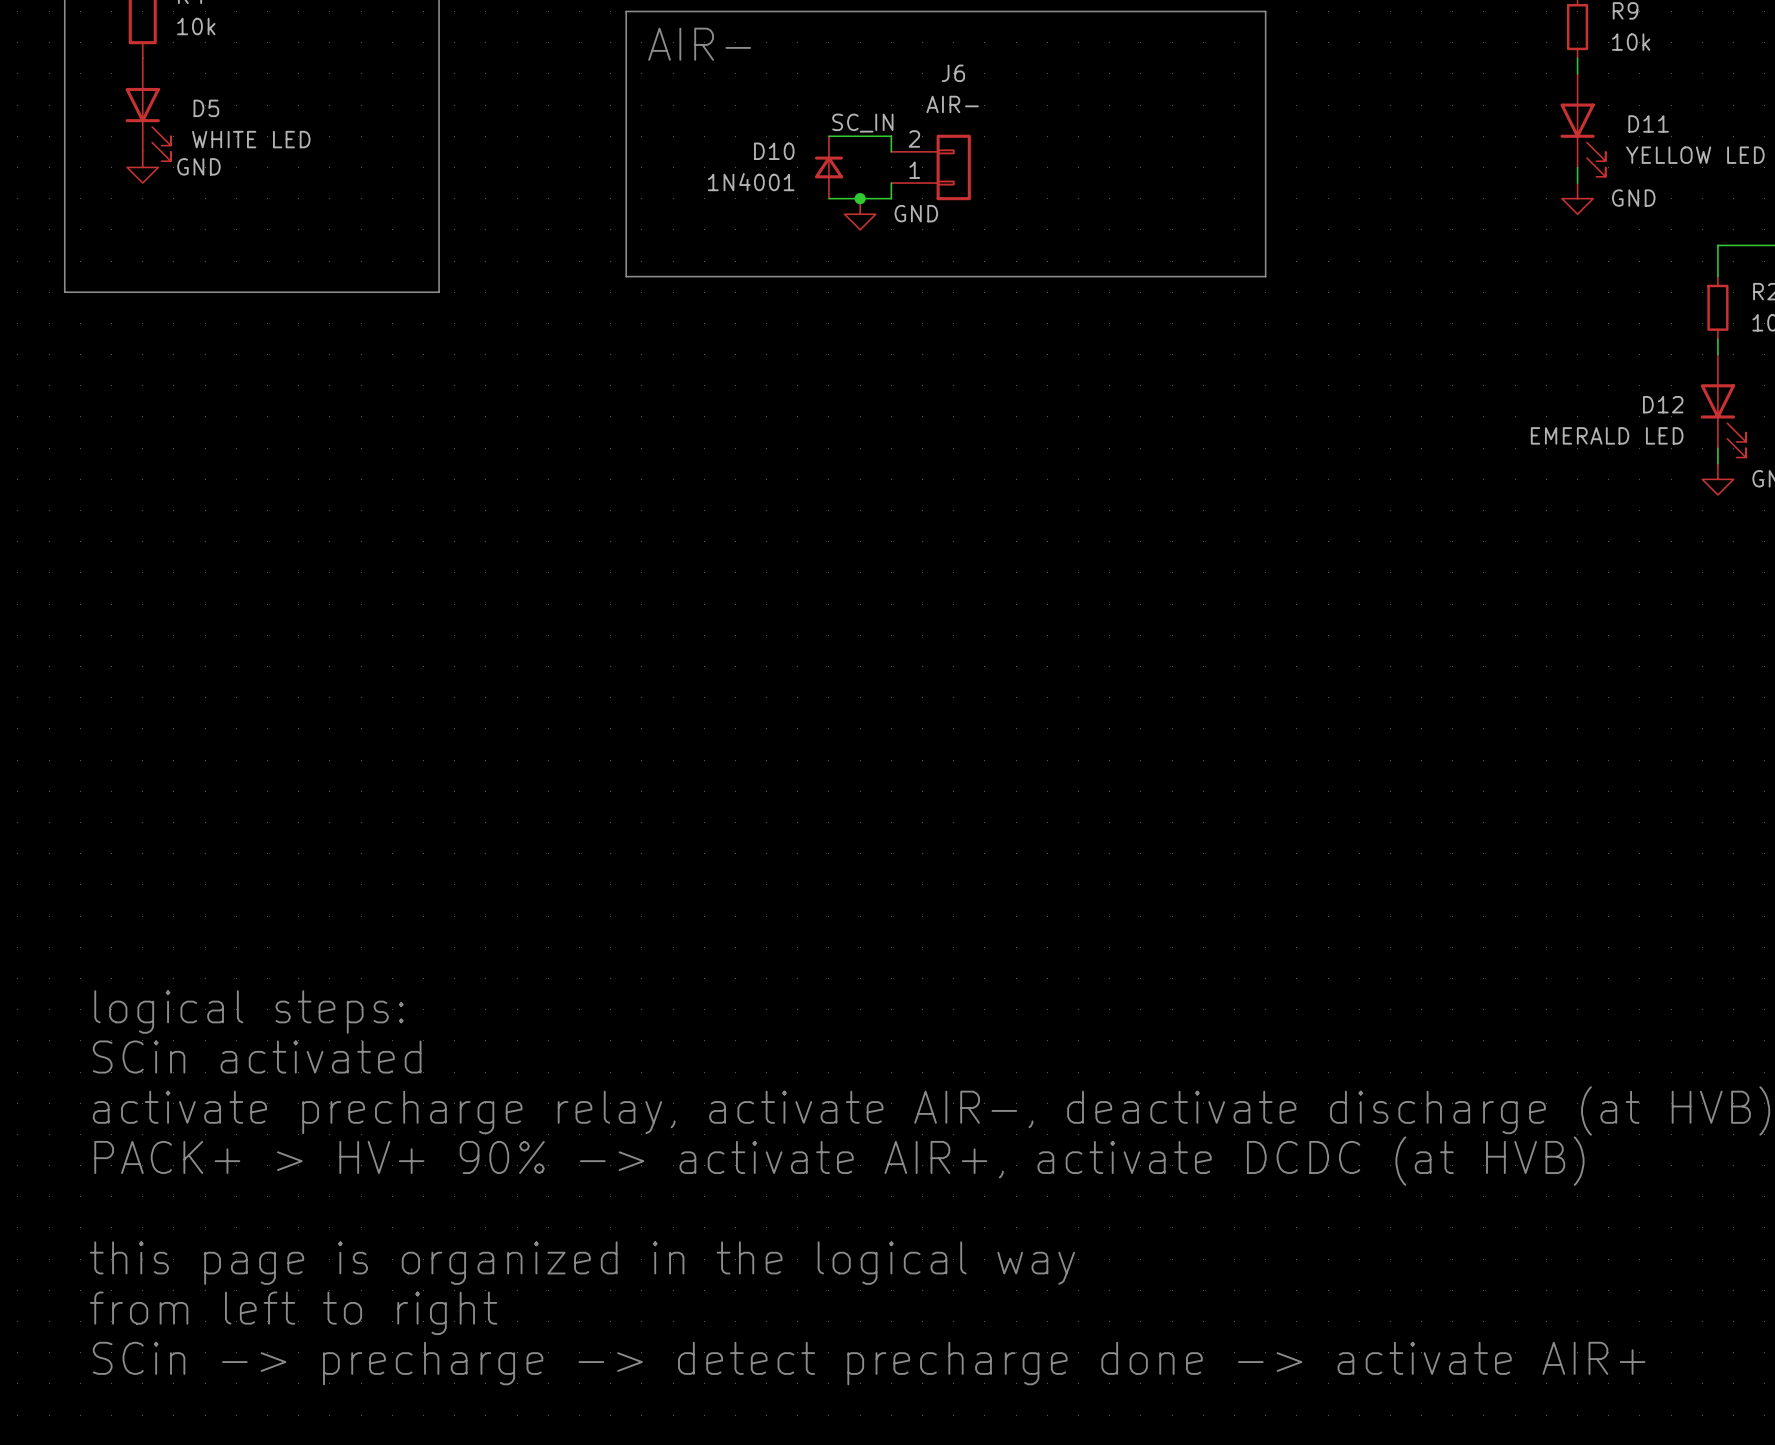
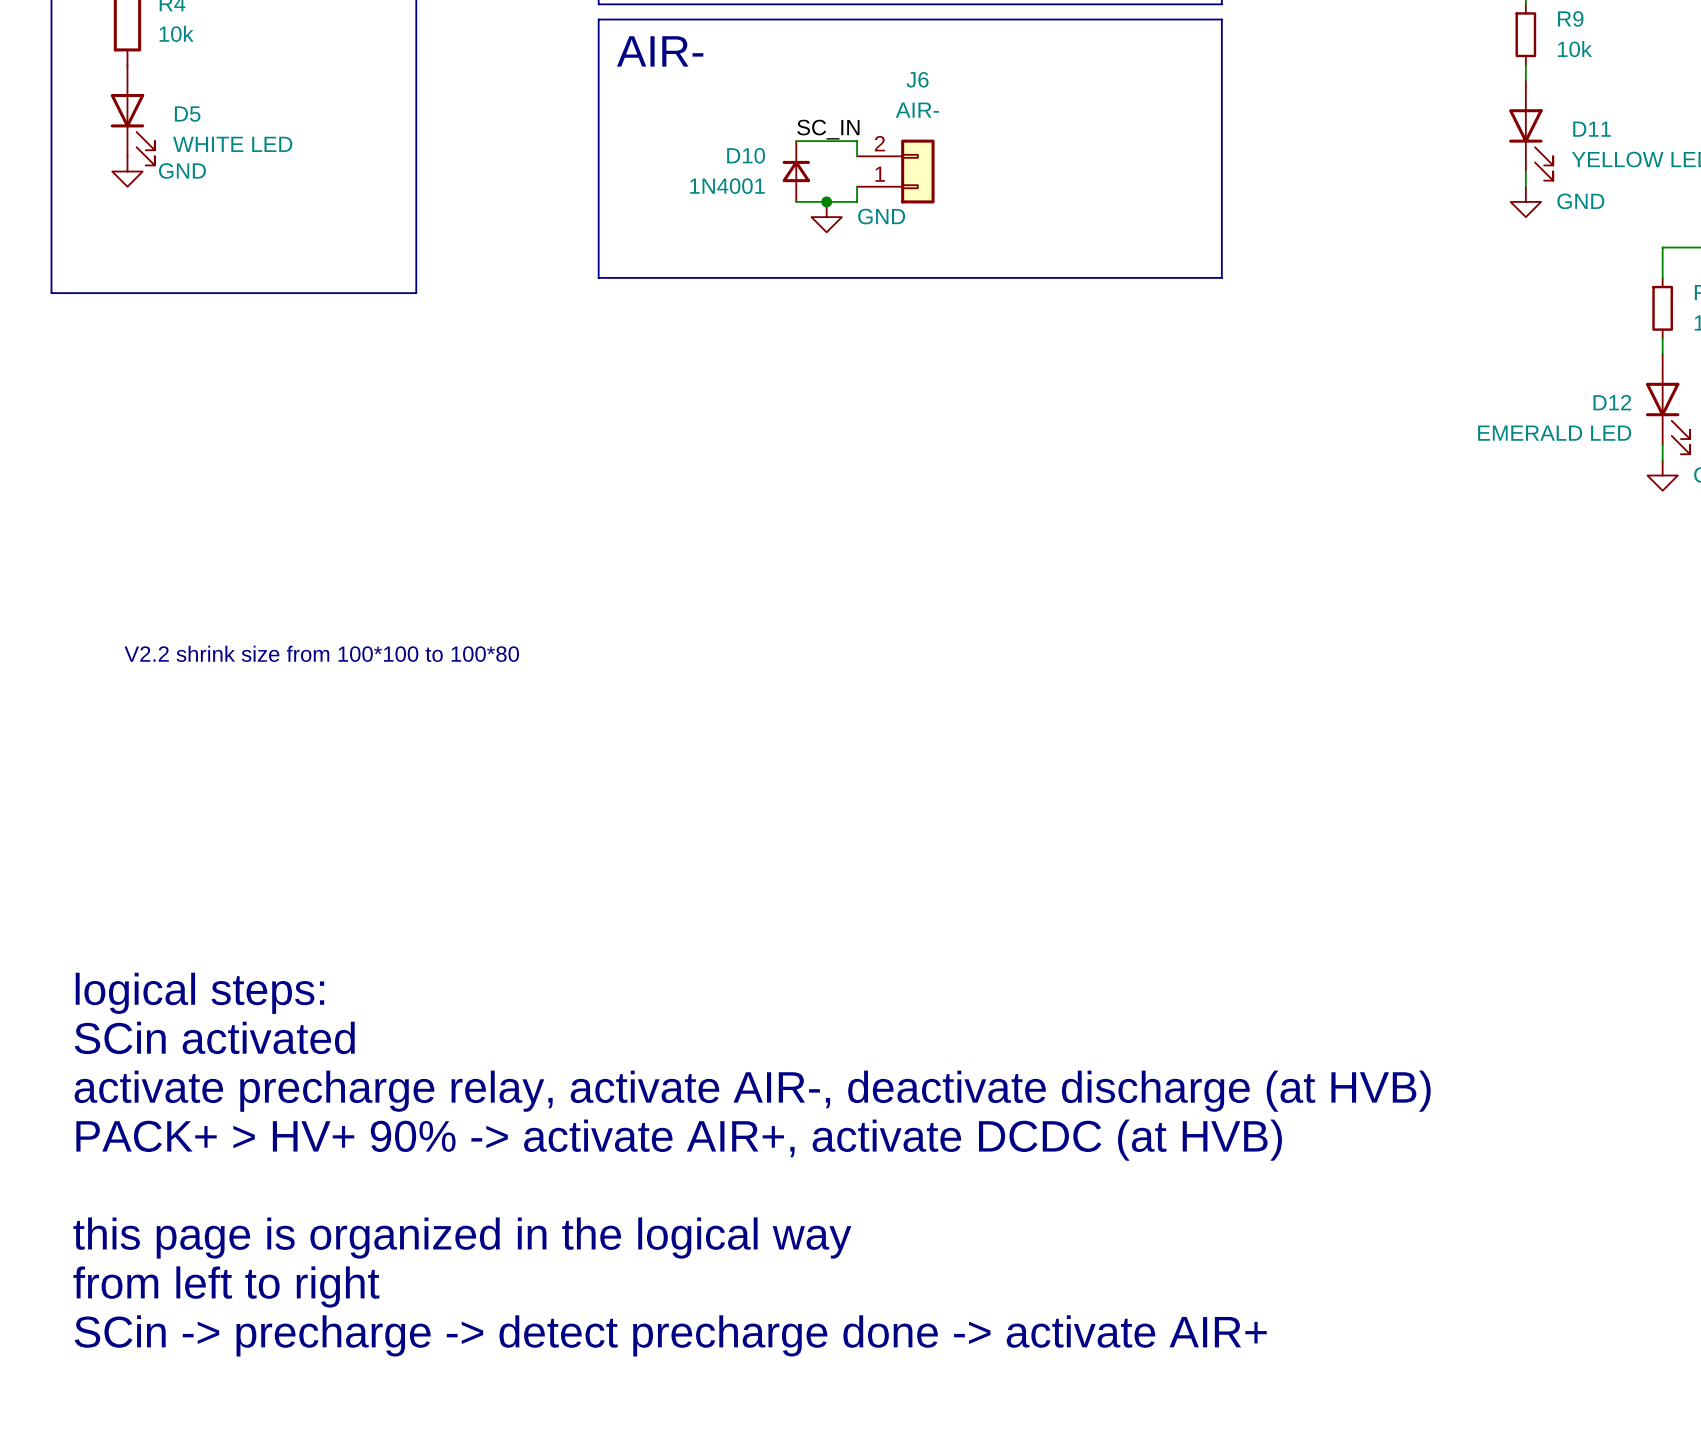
text: none -> V2.2 shrink size from 100*100 to 100*80 (321, 653)

